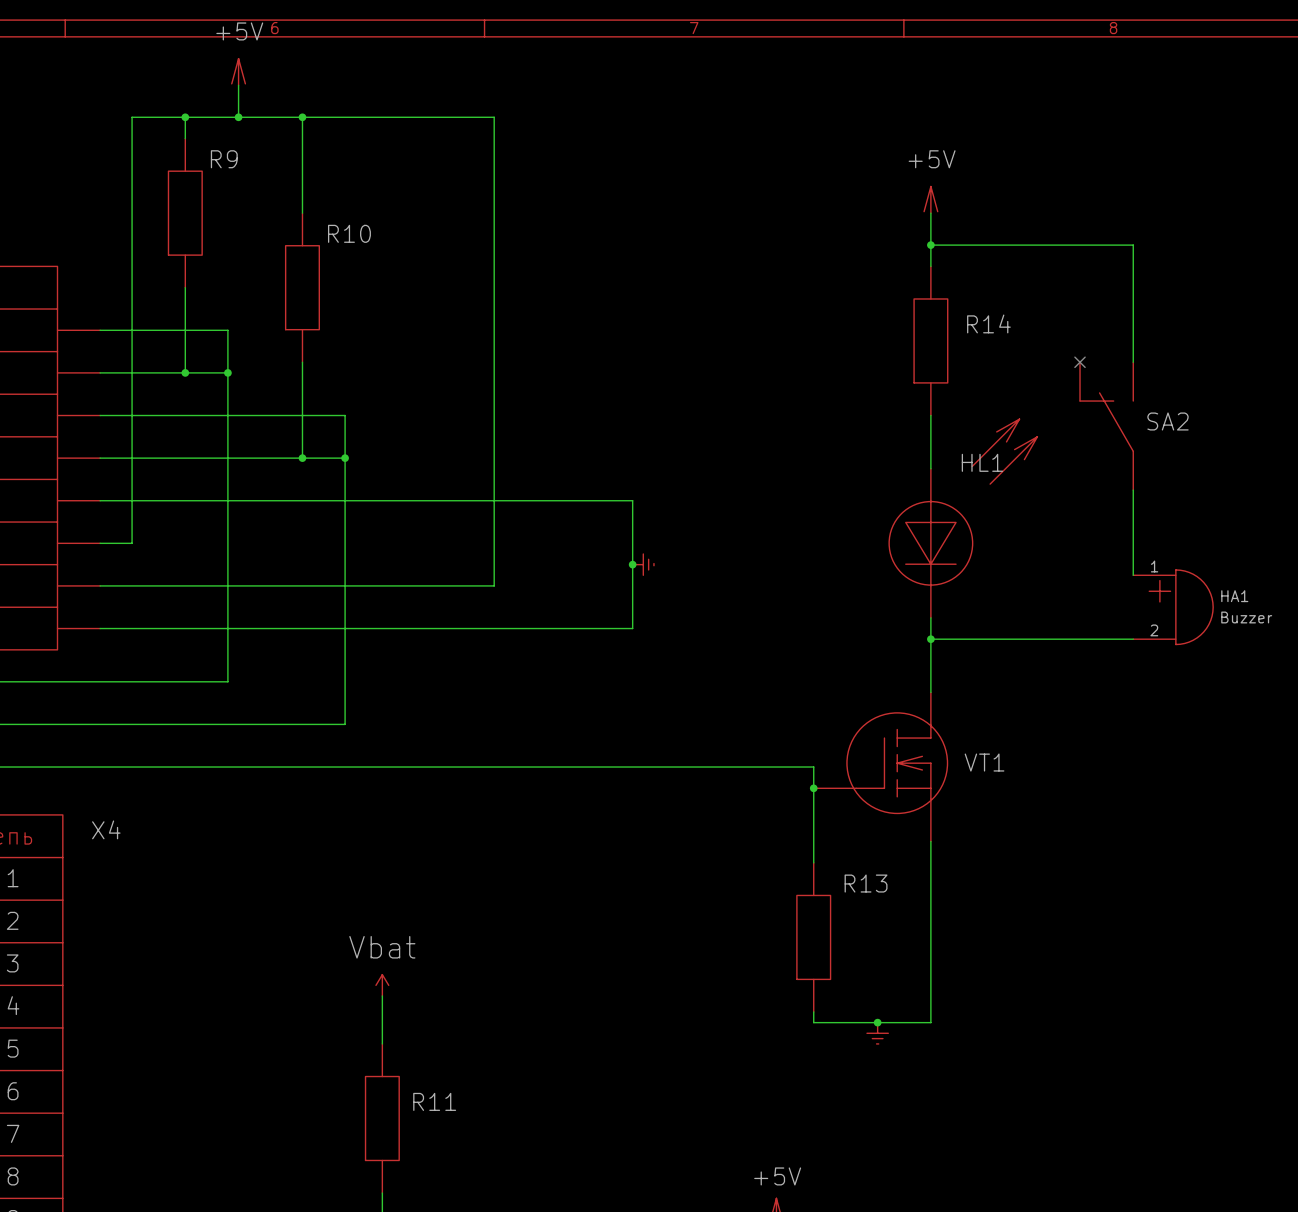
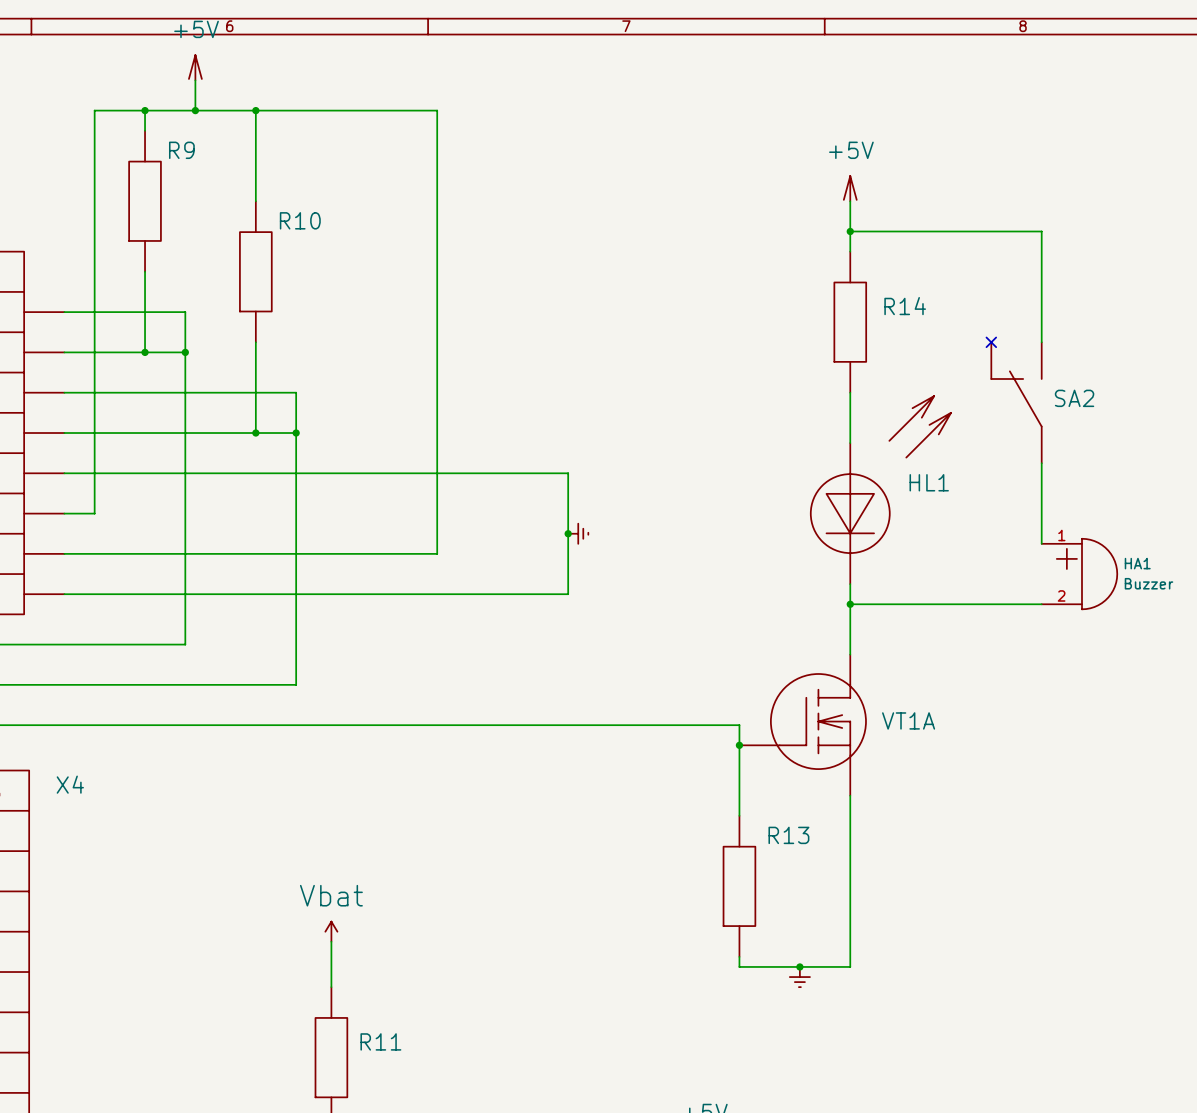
HL1 name position: HL1 (982, 462) -> HL1 (929, 482)
VT1 name: VT1 (984, 762) -> VT1A (908, 720)

